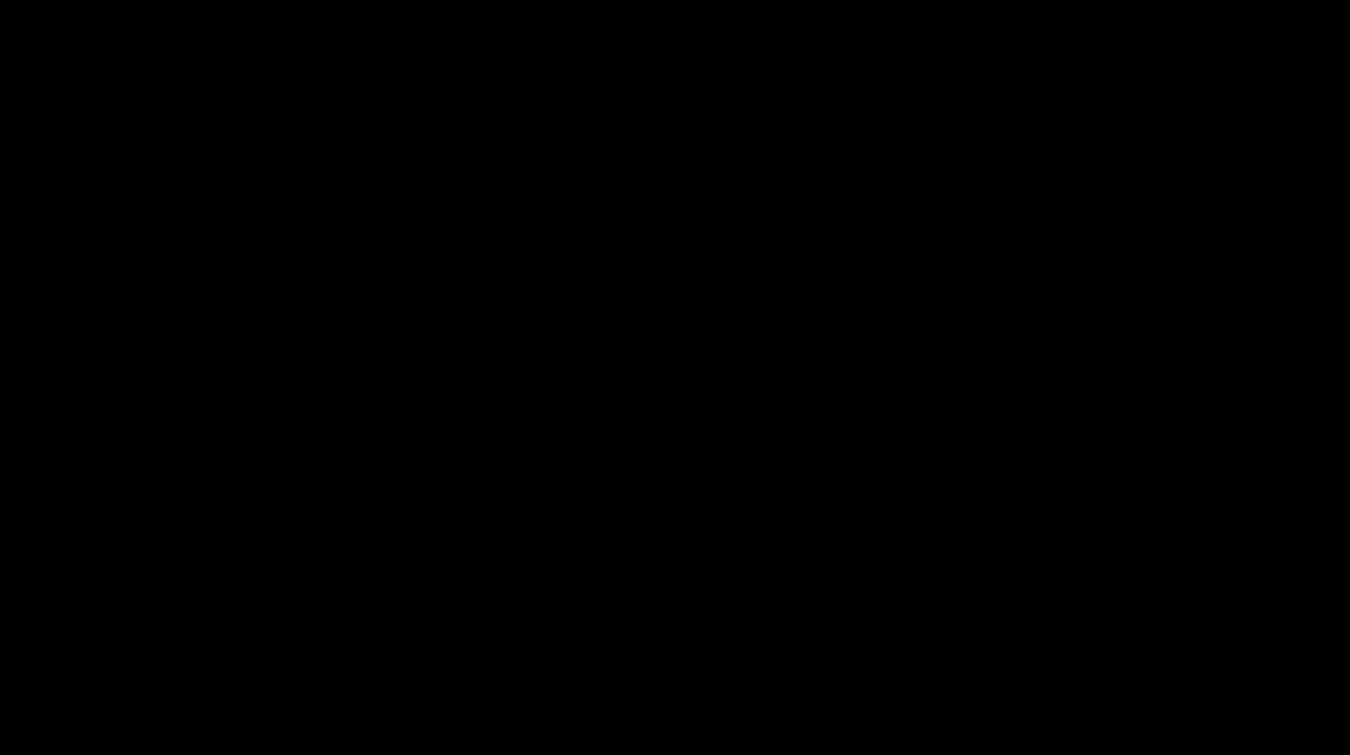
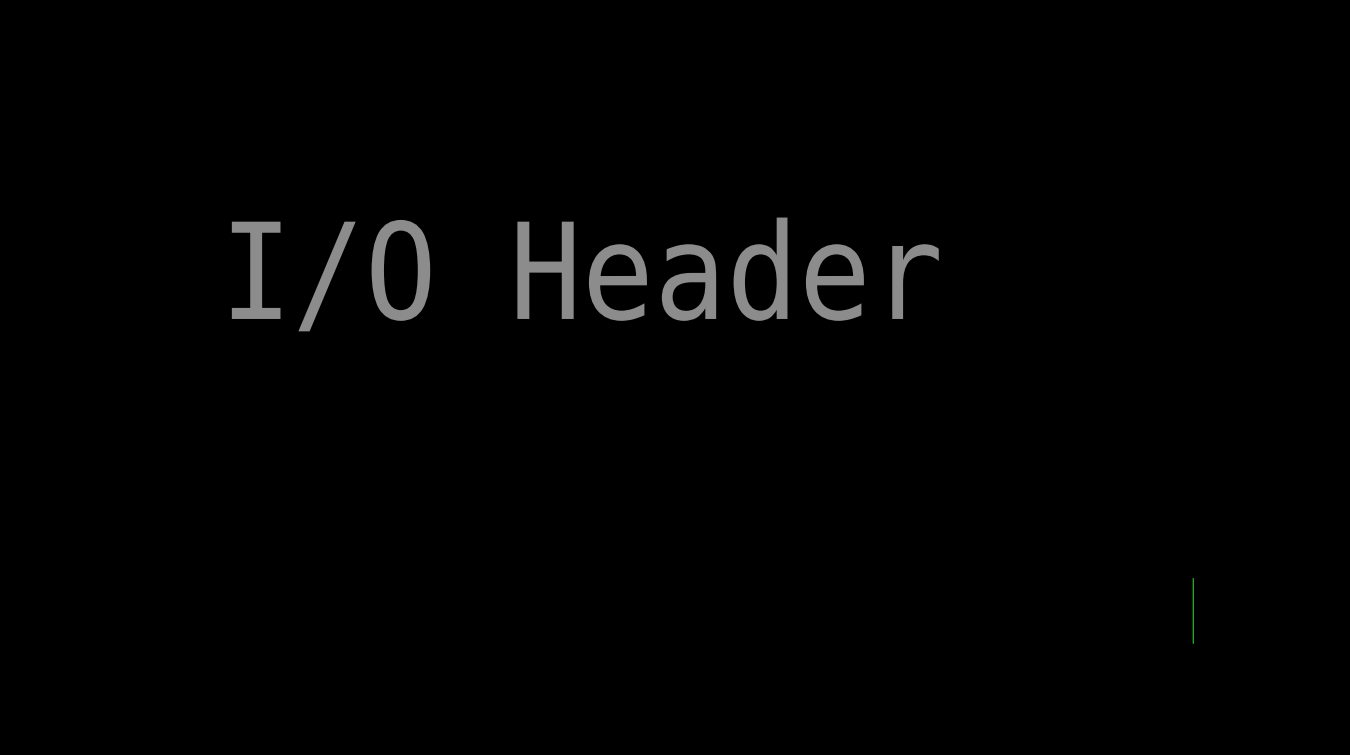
text: none -> I/O Header (585, 274)
wire: none -> (1193, 578) (1193, 643)

